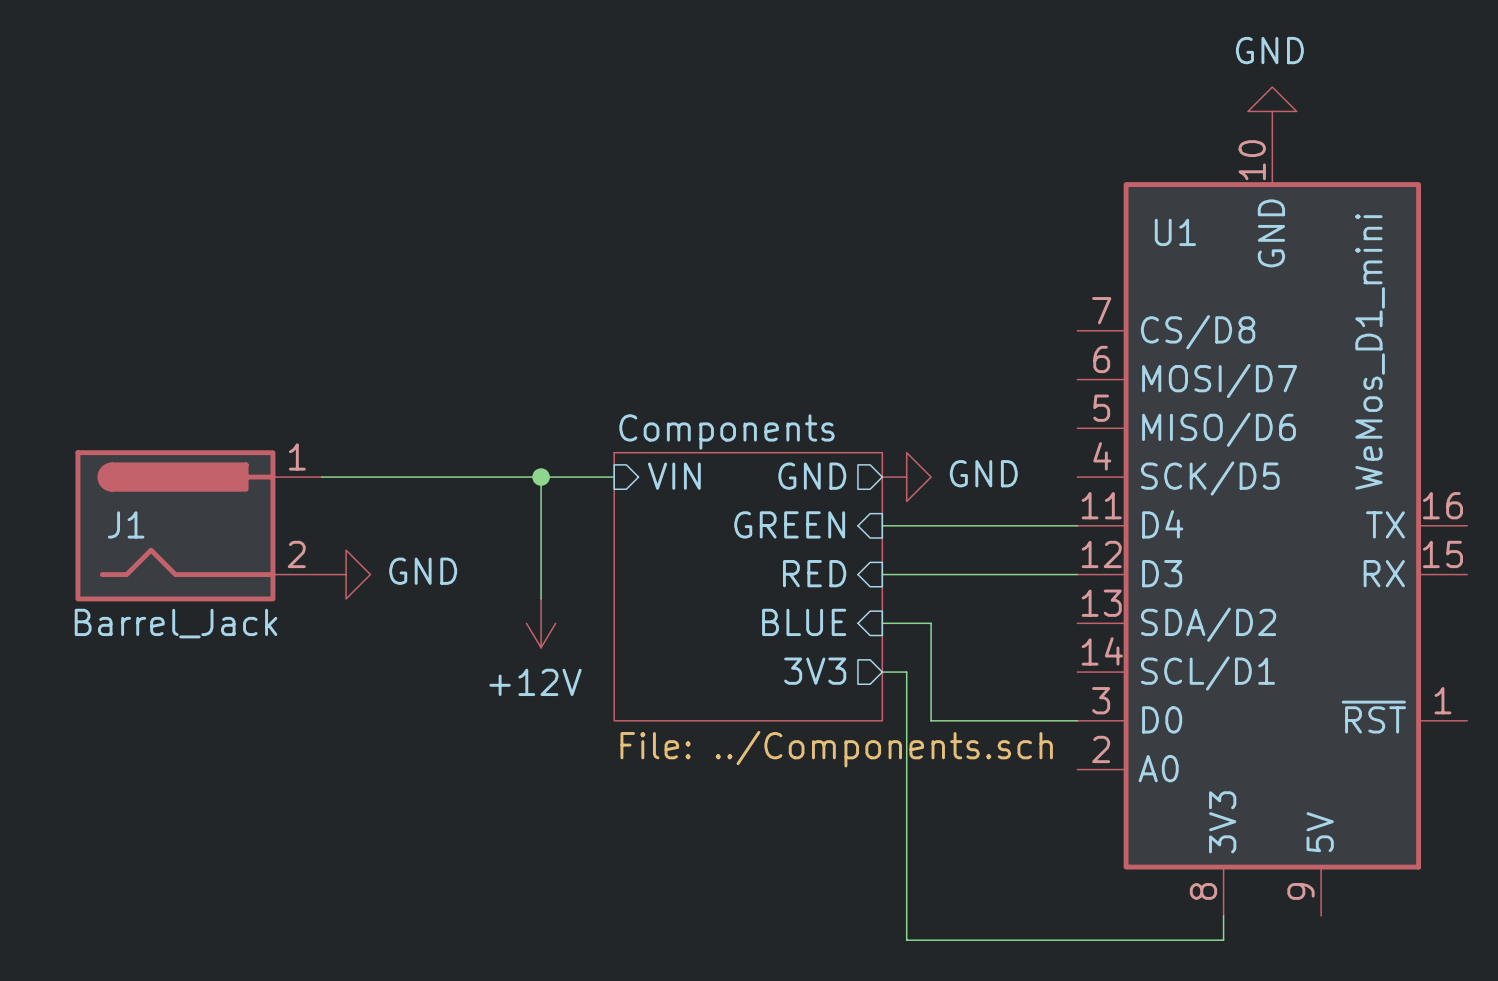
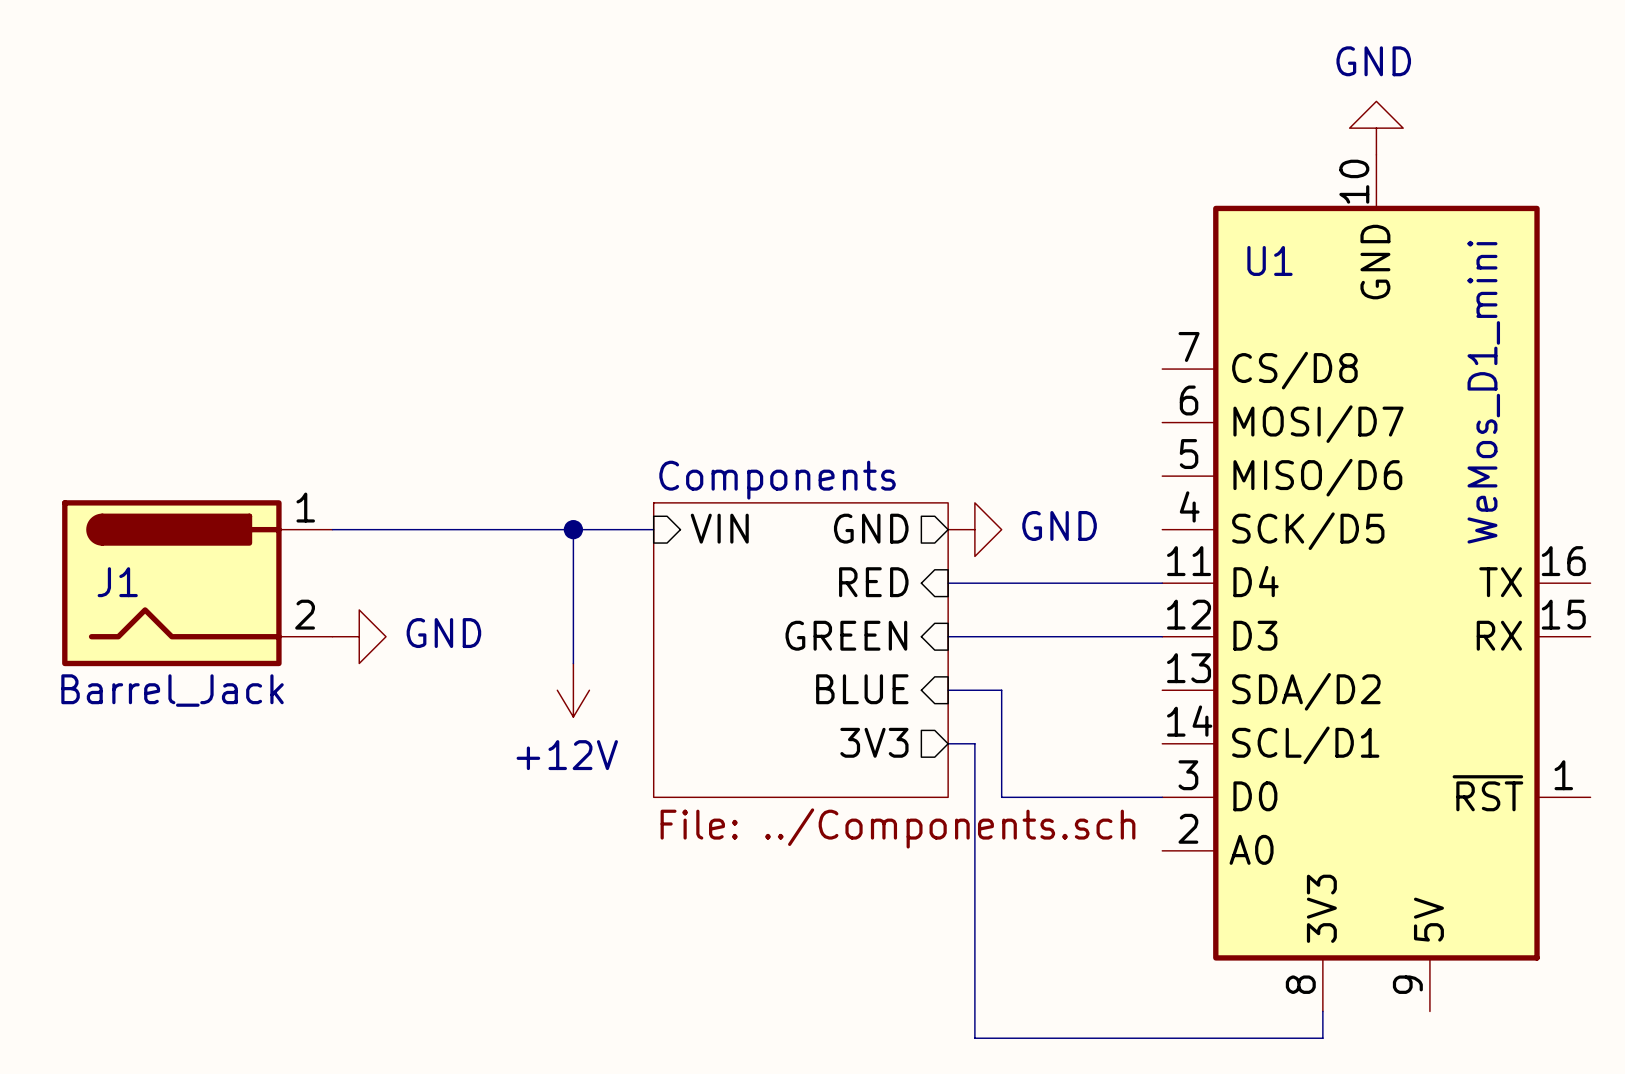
sheet pin: GREEN (789, 524) -> RED (873, 582)
sheet pin: RED (814, 573) -> GREEN (846, 635)

